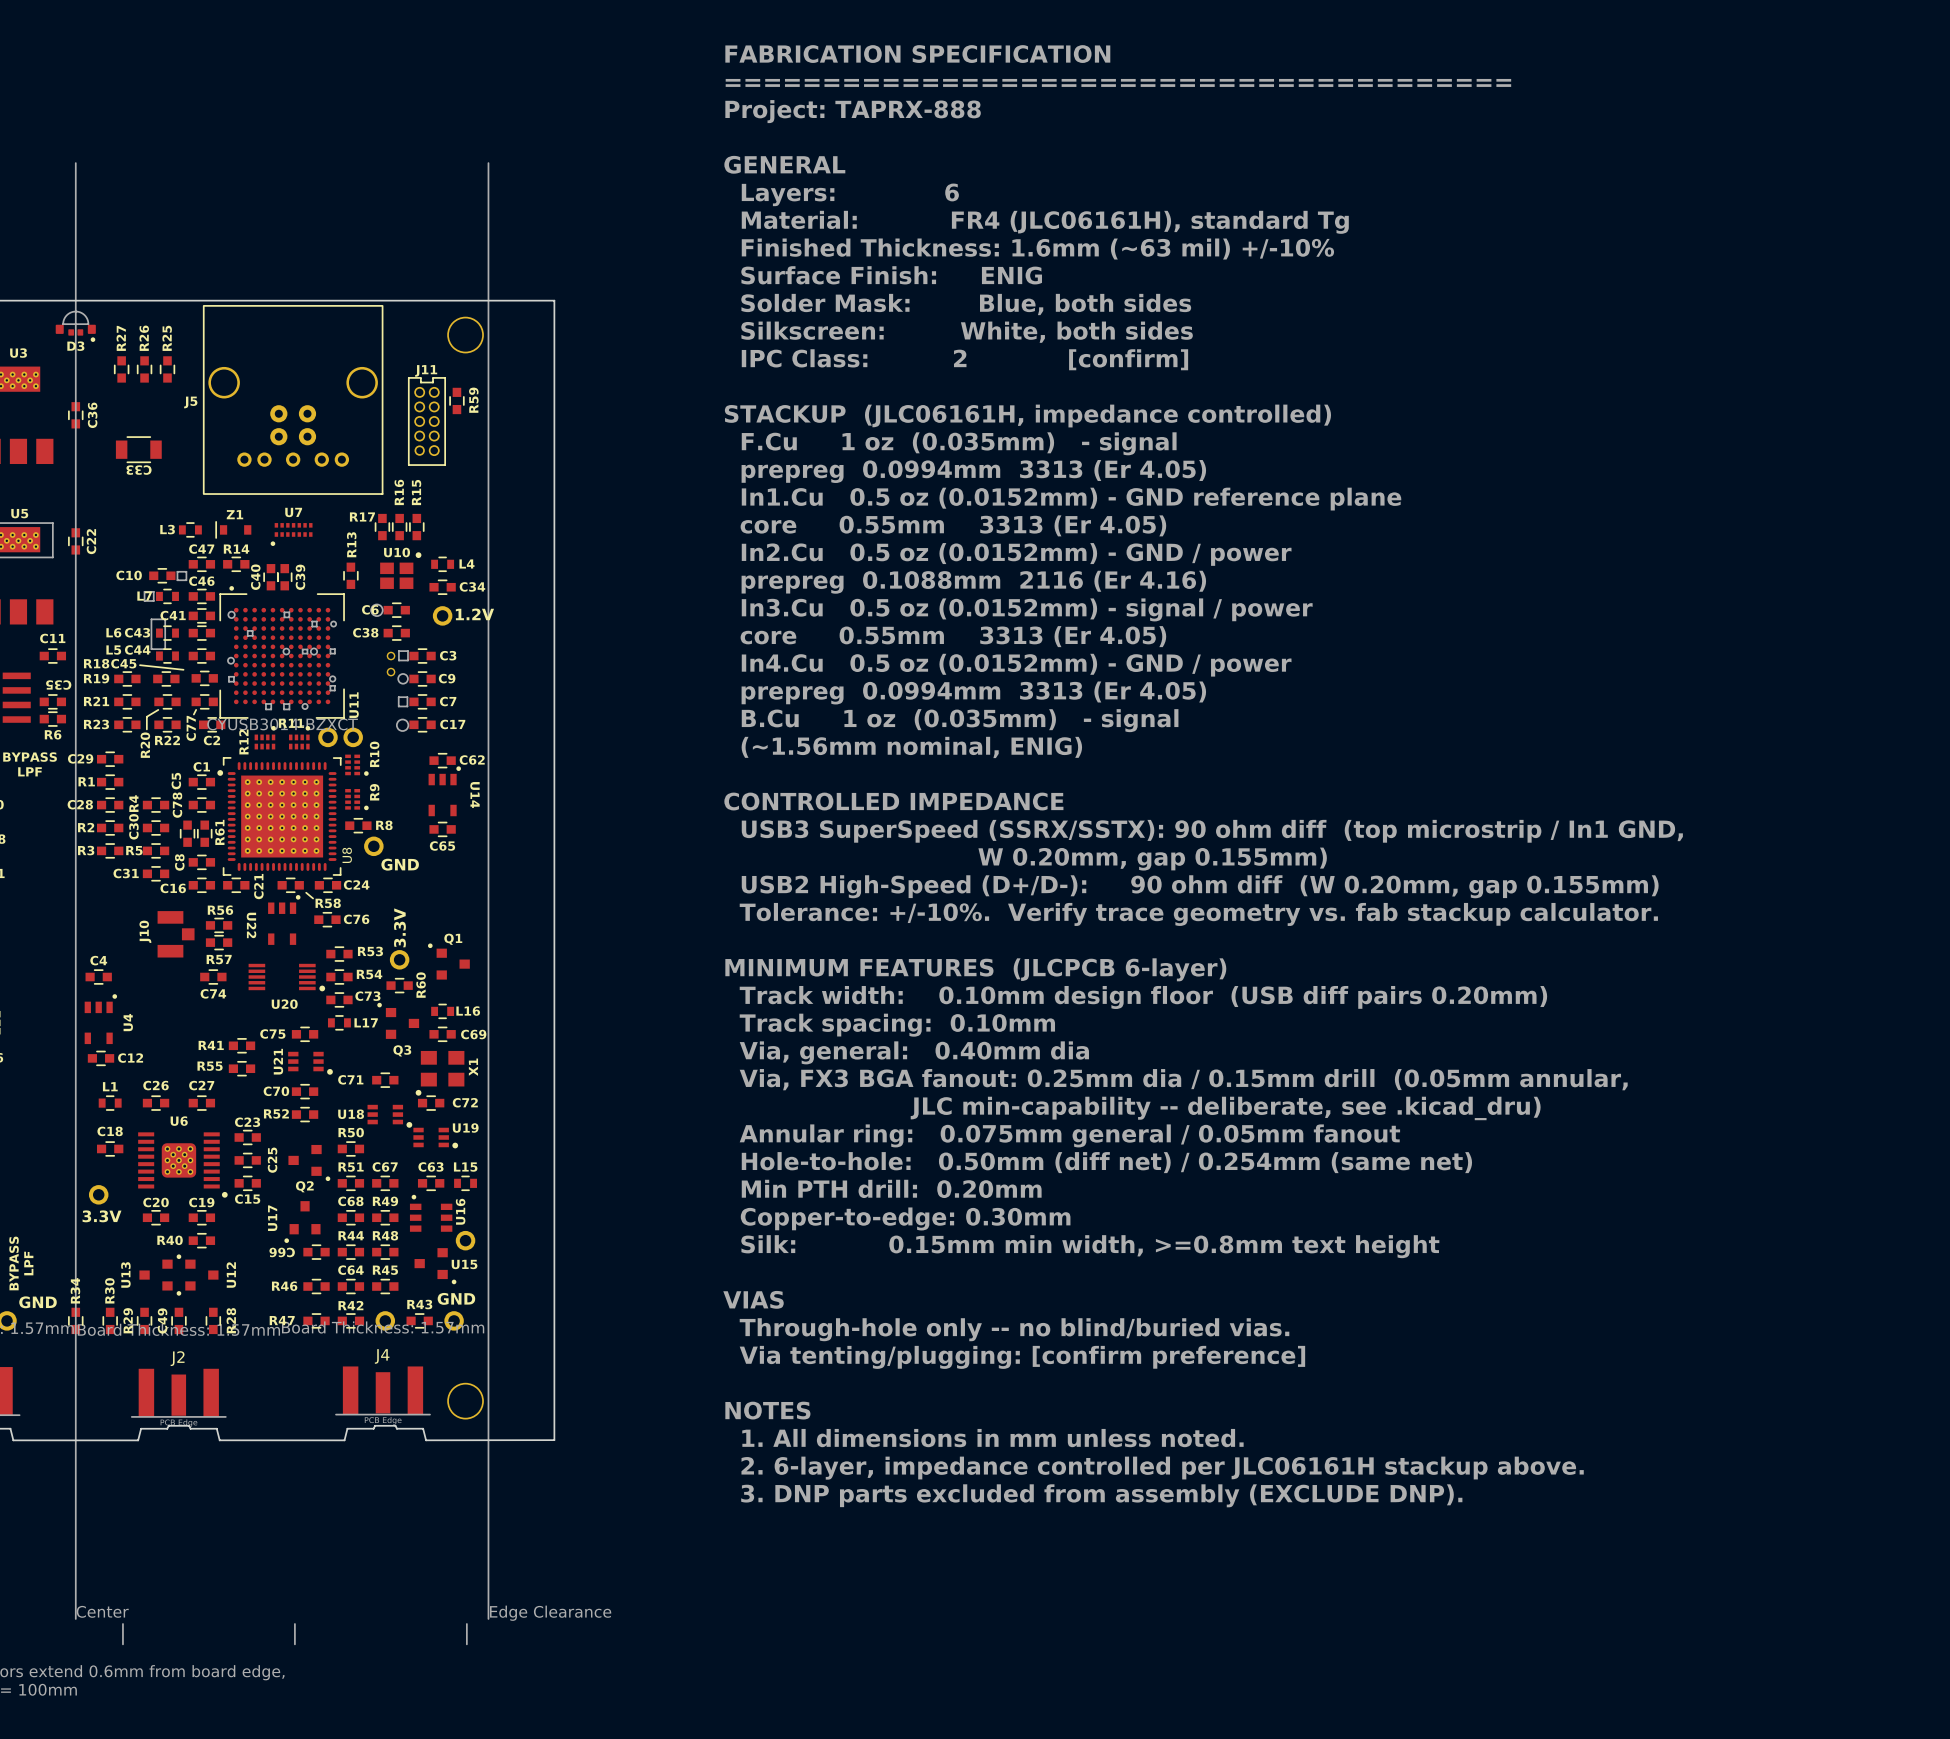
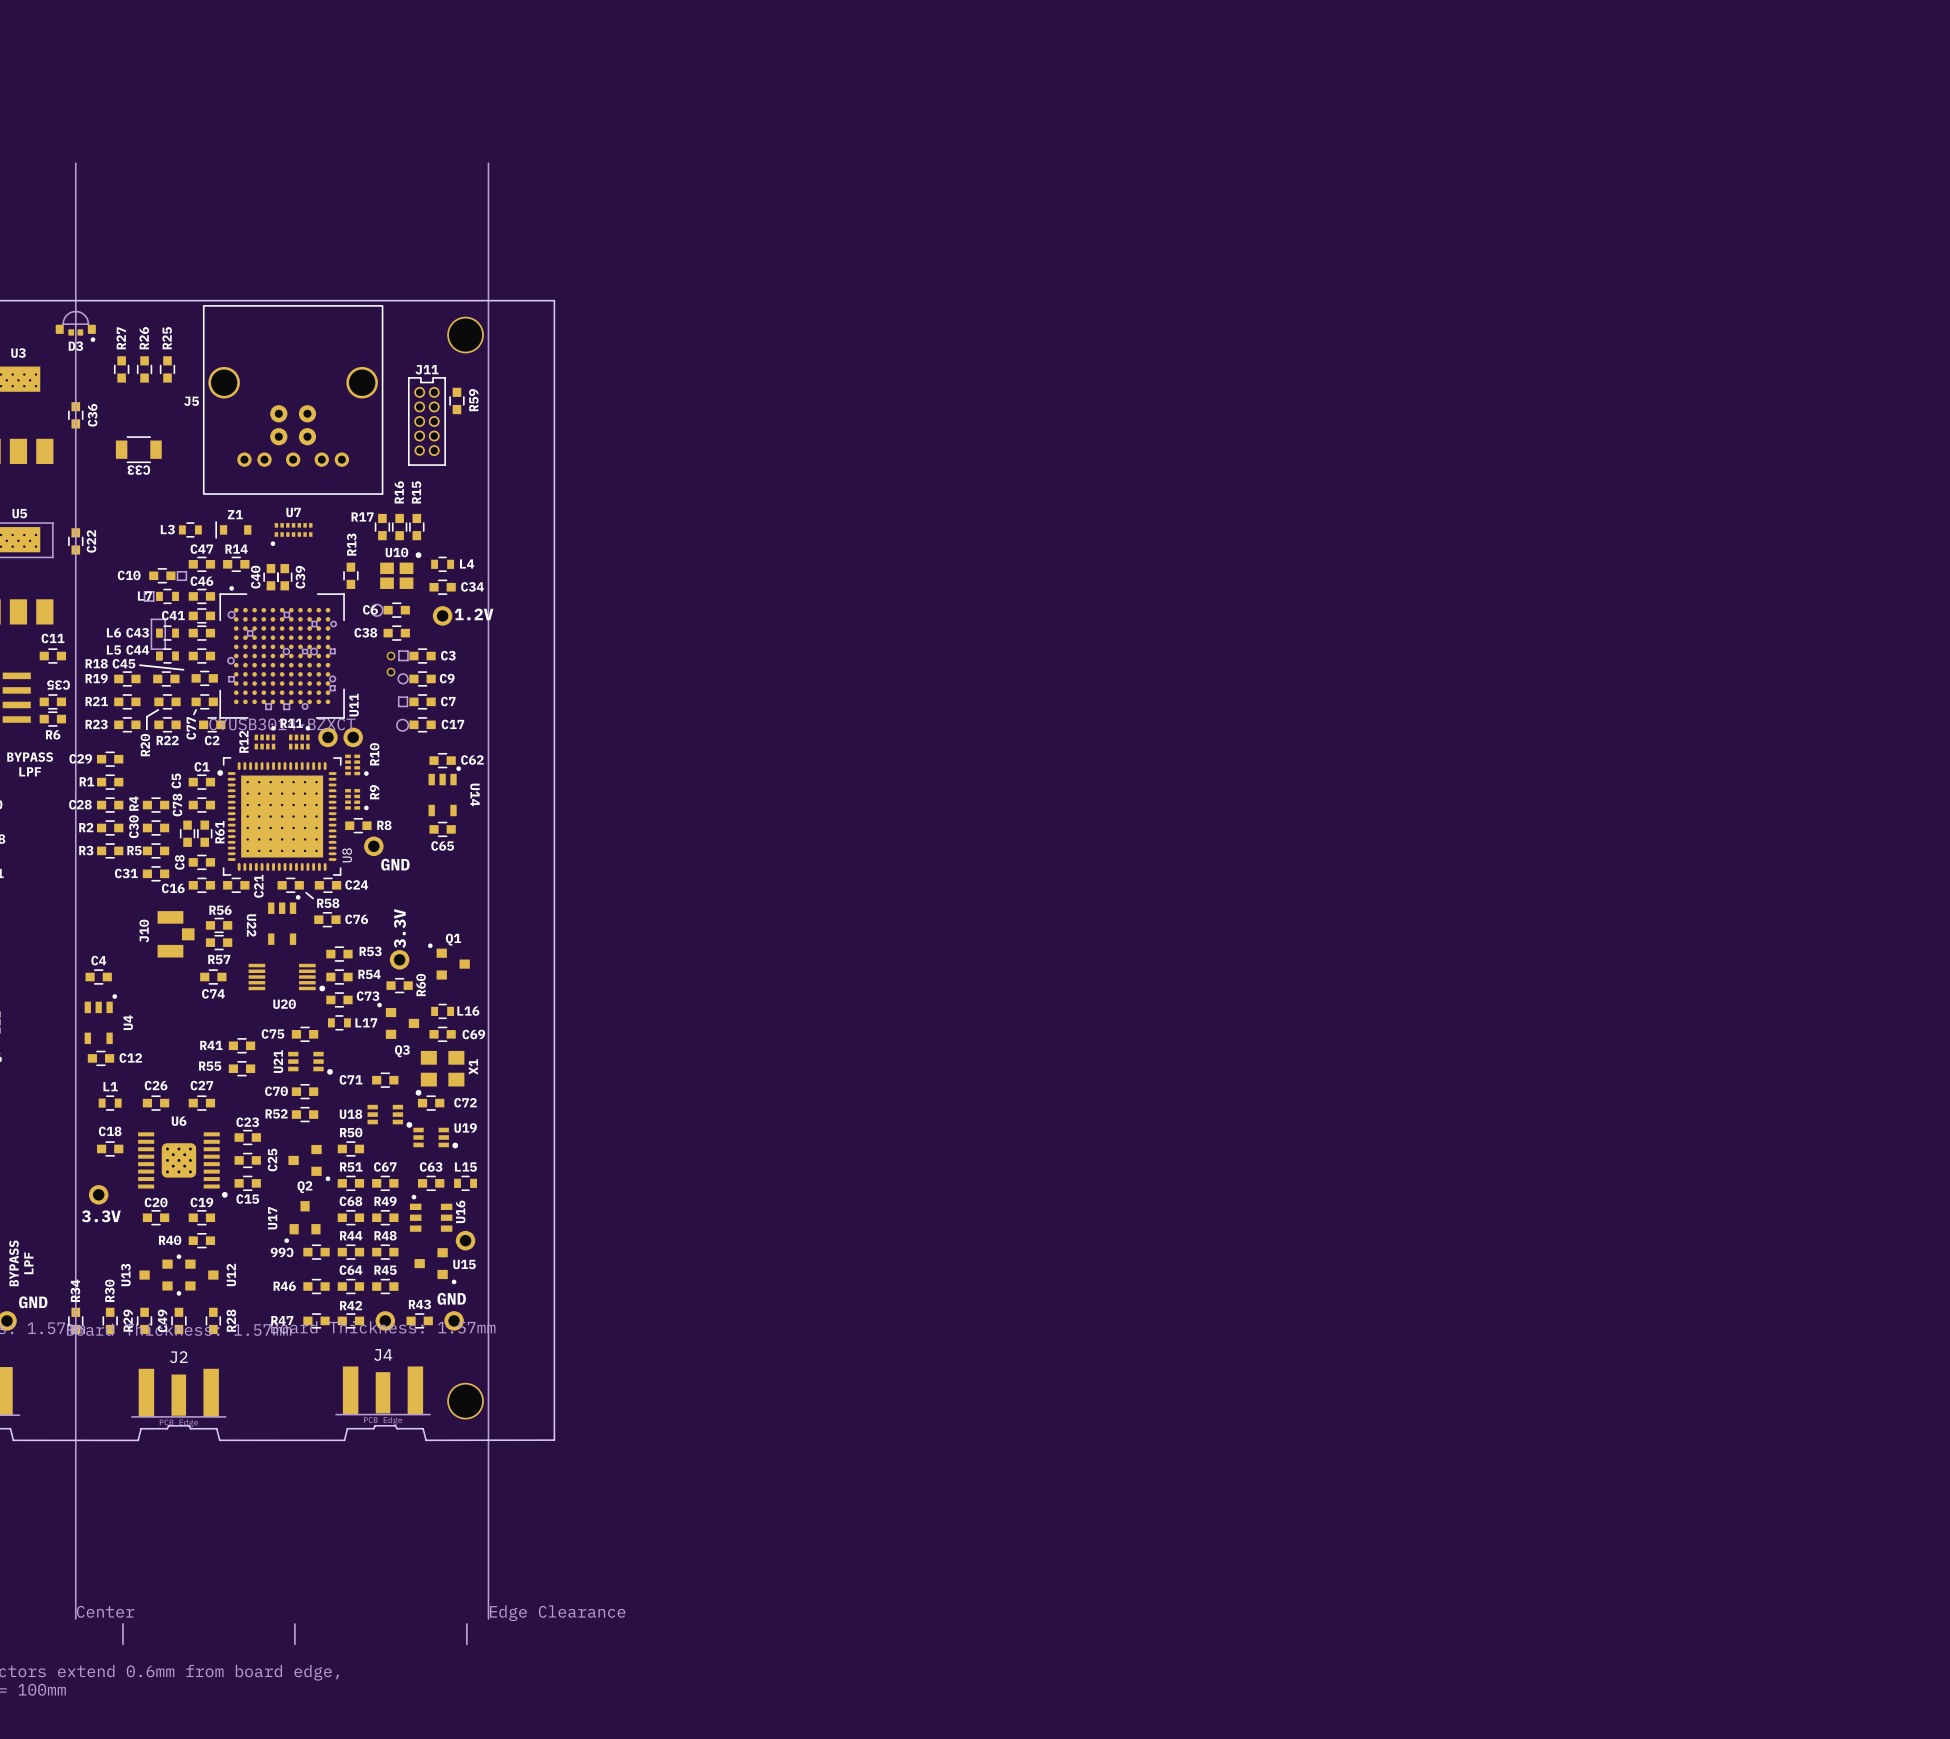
text: FABRICATION SPECIFICATION (917, 54) -> none
text: ======================================== (1118, 82) -> none
text: Project: TAPRX-888 (853, 111) -> none
text: GENERAL (784, 164) -> none
text: Layers: 6 (850, 194) -> none
text: Material: FR4 (JLC06161H), standard Tg (1045, 222) -> none
text: Finished Thickness: 1.6mm (~63 mil) +/-10% (1037, 249) -> none
text: Surface Finish: ENIG (891, 275) -> none
text: Solder Mask: Blue, both sides (966, 304) -> none
text: Silkscreen: White, both sides (967, 332) -> none
text: IPC Class: 2 [confirm] (964, 359) -> none
text: STACKUP (JLC06161H, impedance controlled) (1027, 416) -> none
text: F.Cu 1 oz (0.035mm) - signal (959, 443) -> none
text: prepreg 0.0994mm 3313 (Er 4.05) (973, 471) -> none
text: In1.Cu 0.5 oz (0.0152mm) - GND reference plane (1071, 499) -> none
text: core 0.55mm 3313 (Er 4.05) (953, 525) -> none
text: In2.Cu 0.5 oz (0.0152mm) - GND / power (1016, 554) -> none
text: prepreg 0.1088mm 2116 (Er 4.16) (973, 582) -> none
text: In3.Cu 0.5 oz (0.0152mm) - signal / power (1027, 609) -> none
text: core 0.55mm 3313 (Er 4.05) (953, 636) -> none
text: In4.Cu 0.5 oz (0.0152mm) - GND / power (1016, 665) -> none
text: prepreg 0.0994mm 3313 (Er 4.05) (973, 692) -> none
text: B.Cu 1 oz (0.035mm) - signal (960, 720) -> none
text: (~1.56mm nominal, ENIG) (911, 747) -> none
text: CONTROLLED IMPEDANCE (893, 801) -> none
text: USB3 SuperSpeed (SSRX/SSTX): 90 ohm diff (top microstrip / In1 GND, (1212, 831) -> none
text: W 0.20mm, gap 0.155mm) (1152, 859) -> none
text: USB2 High-Speed (D+/D-): 90 ohm diff (W 0.20mm, gap 0.155mm) (1200, 886) -> none
text: Tolerance: +/-10%. Verify trace geometry vs. fab stackup calculator. (1198, 914) -> none
text: MINIMUM FEATURES (JLCPCB 6-layer) (975, 969) -> none
text: Track width: 0.10mm design floor (USB diff pairs 0.20mm) (1143, 997) -> none
text: Track spacing: 0.10mm (897, 1025) -> none
text: Via, general: 0.40mm dia (914, 1052) -> none
text: Via, FX3 BGA fanout: 0.25mm dia / 0.15mm drill (0.05mm annular, (1183, 1079) -> none
text: JLC min-capability -- deliberate, see .kicad_dru) (1225, 1108) -> none
text: Annular ring: 0.075mm general / 0.05mm fanout (1069, 1135) -> none
text: Hole-to-hole: 0.50mm (diff net) / 0.254mm (same net) (1106, 1162) -> none
text: Min PTH drill: 0.20mm (891, 1188) -> none
text: Copper-to-edge: 0.30mm (905, 1218) -> none
text: Silk: 0.15mm min width, >=0.8mm text height (1090, 1246) -> none
text: VIAS (753, 1299) -> none
text: Through-hole only -- no blind/buried vias. (1014, 1329) -> none
text: Via tenting/plugging: [confirm preference] (1022, 1357) -> none
text: NOTES (767, 1410) -> none
text: 1. All dimensions in mm unless noted. (992, 1438) -> none
text: 2. 6-layer, impedance controlled per JLC06161H stackup above. (1162, 1468) -> none
text: 3. DNP parts excluded from assembly (EXCLUDE DNP). (1101, 1495) -> none

